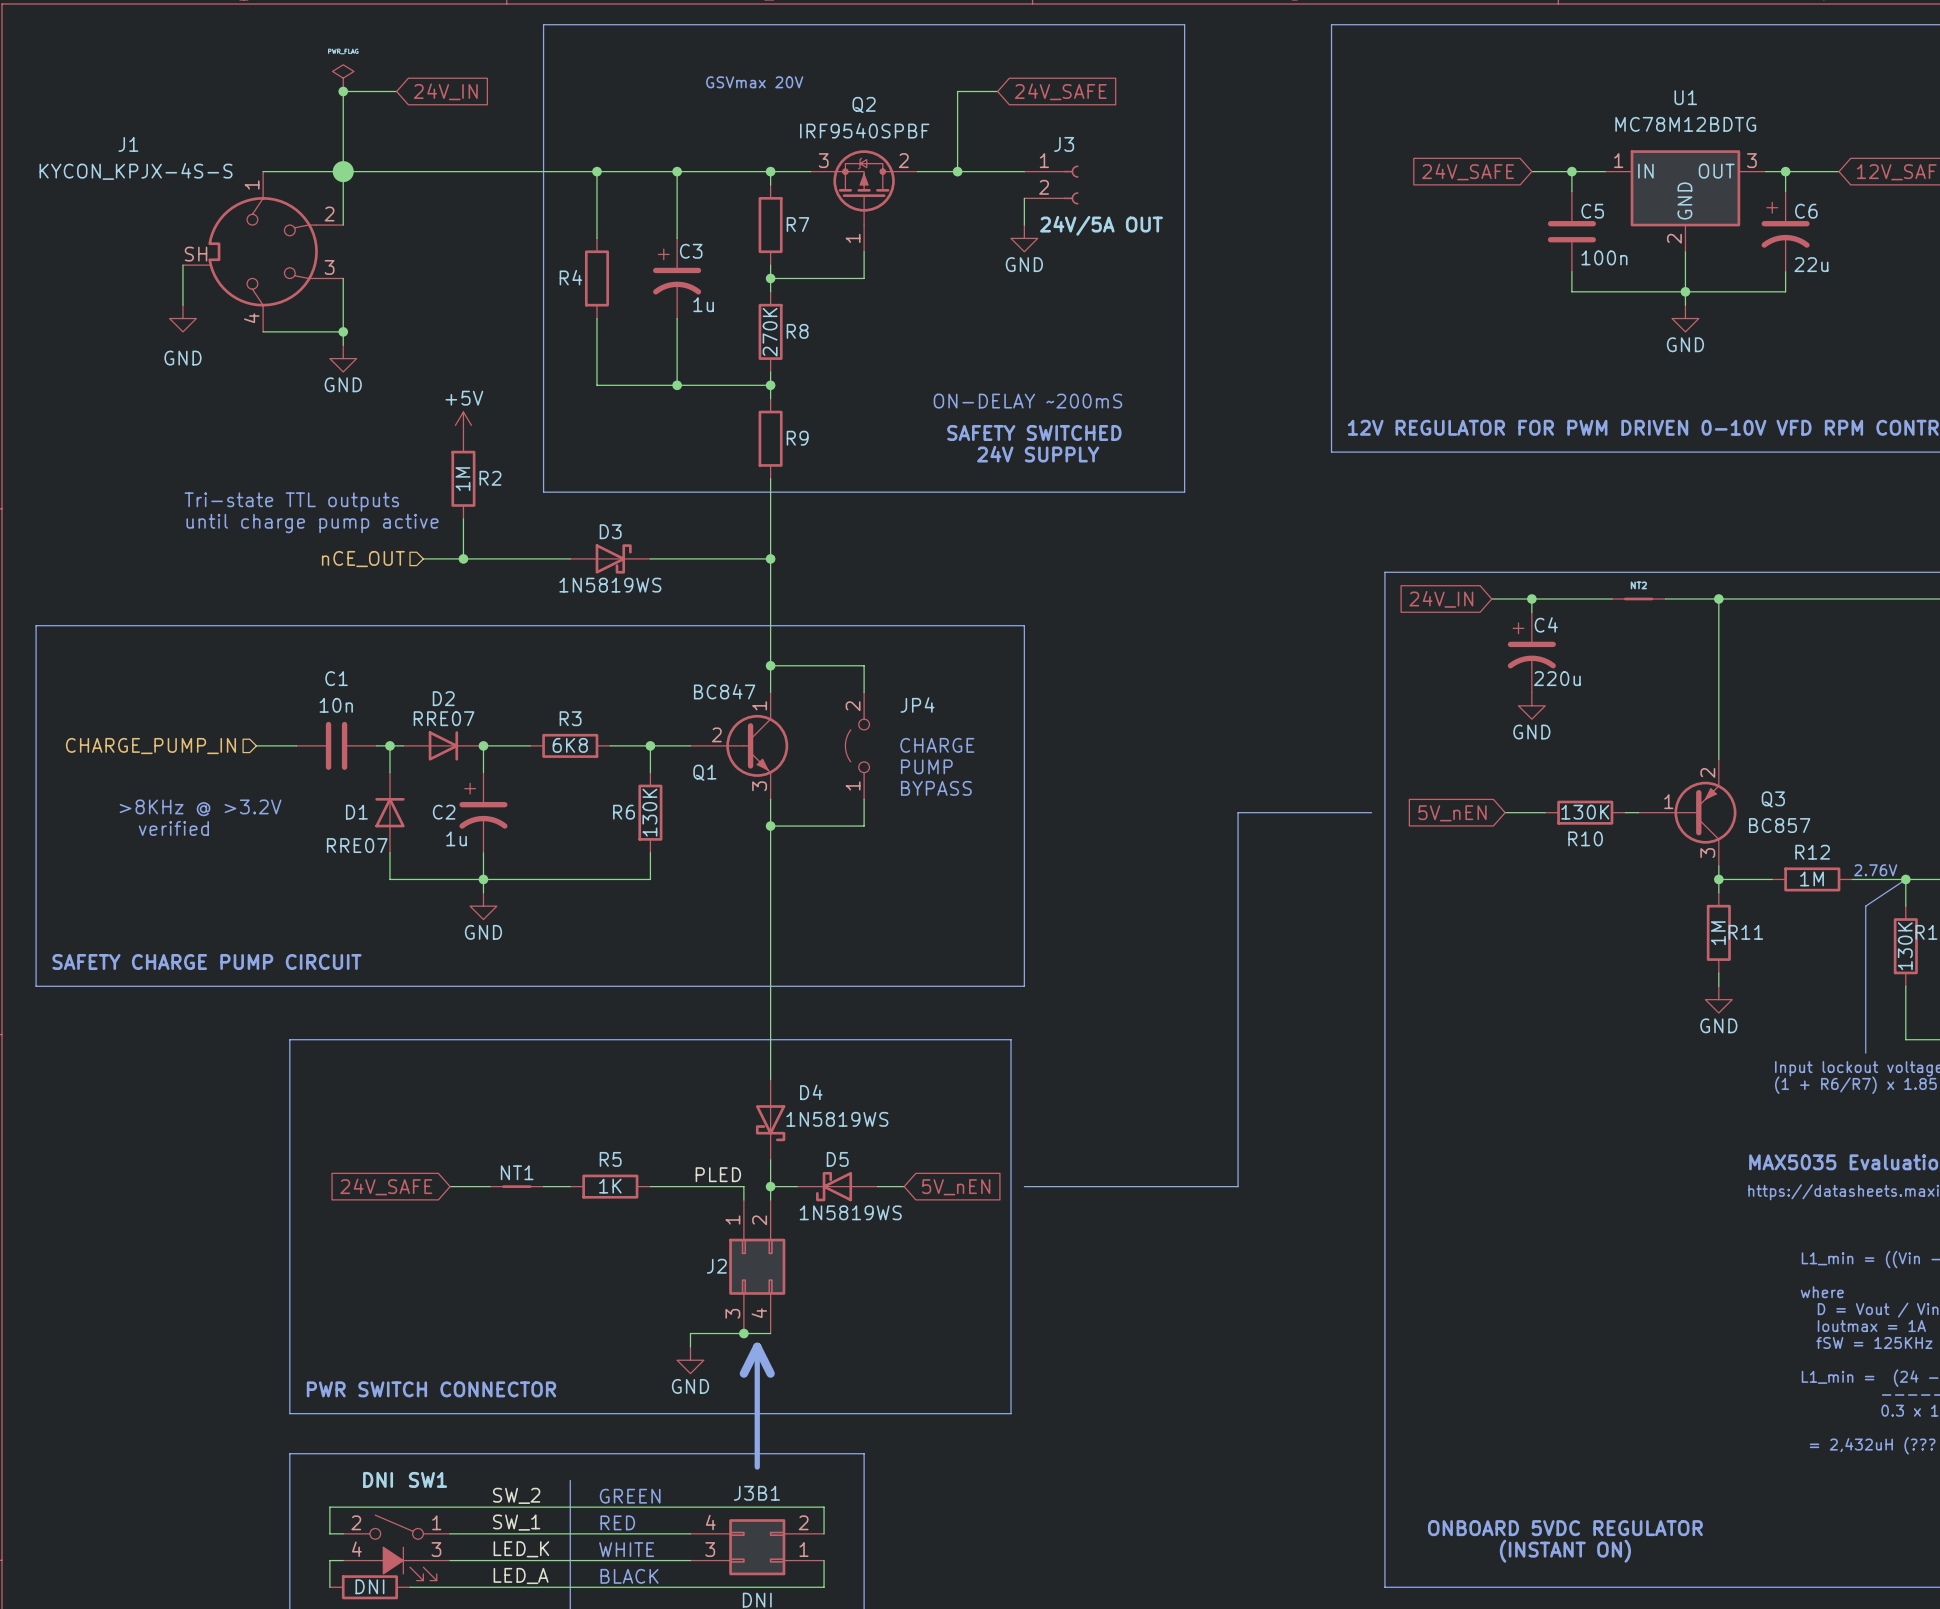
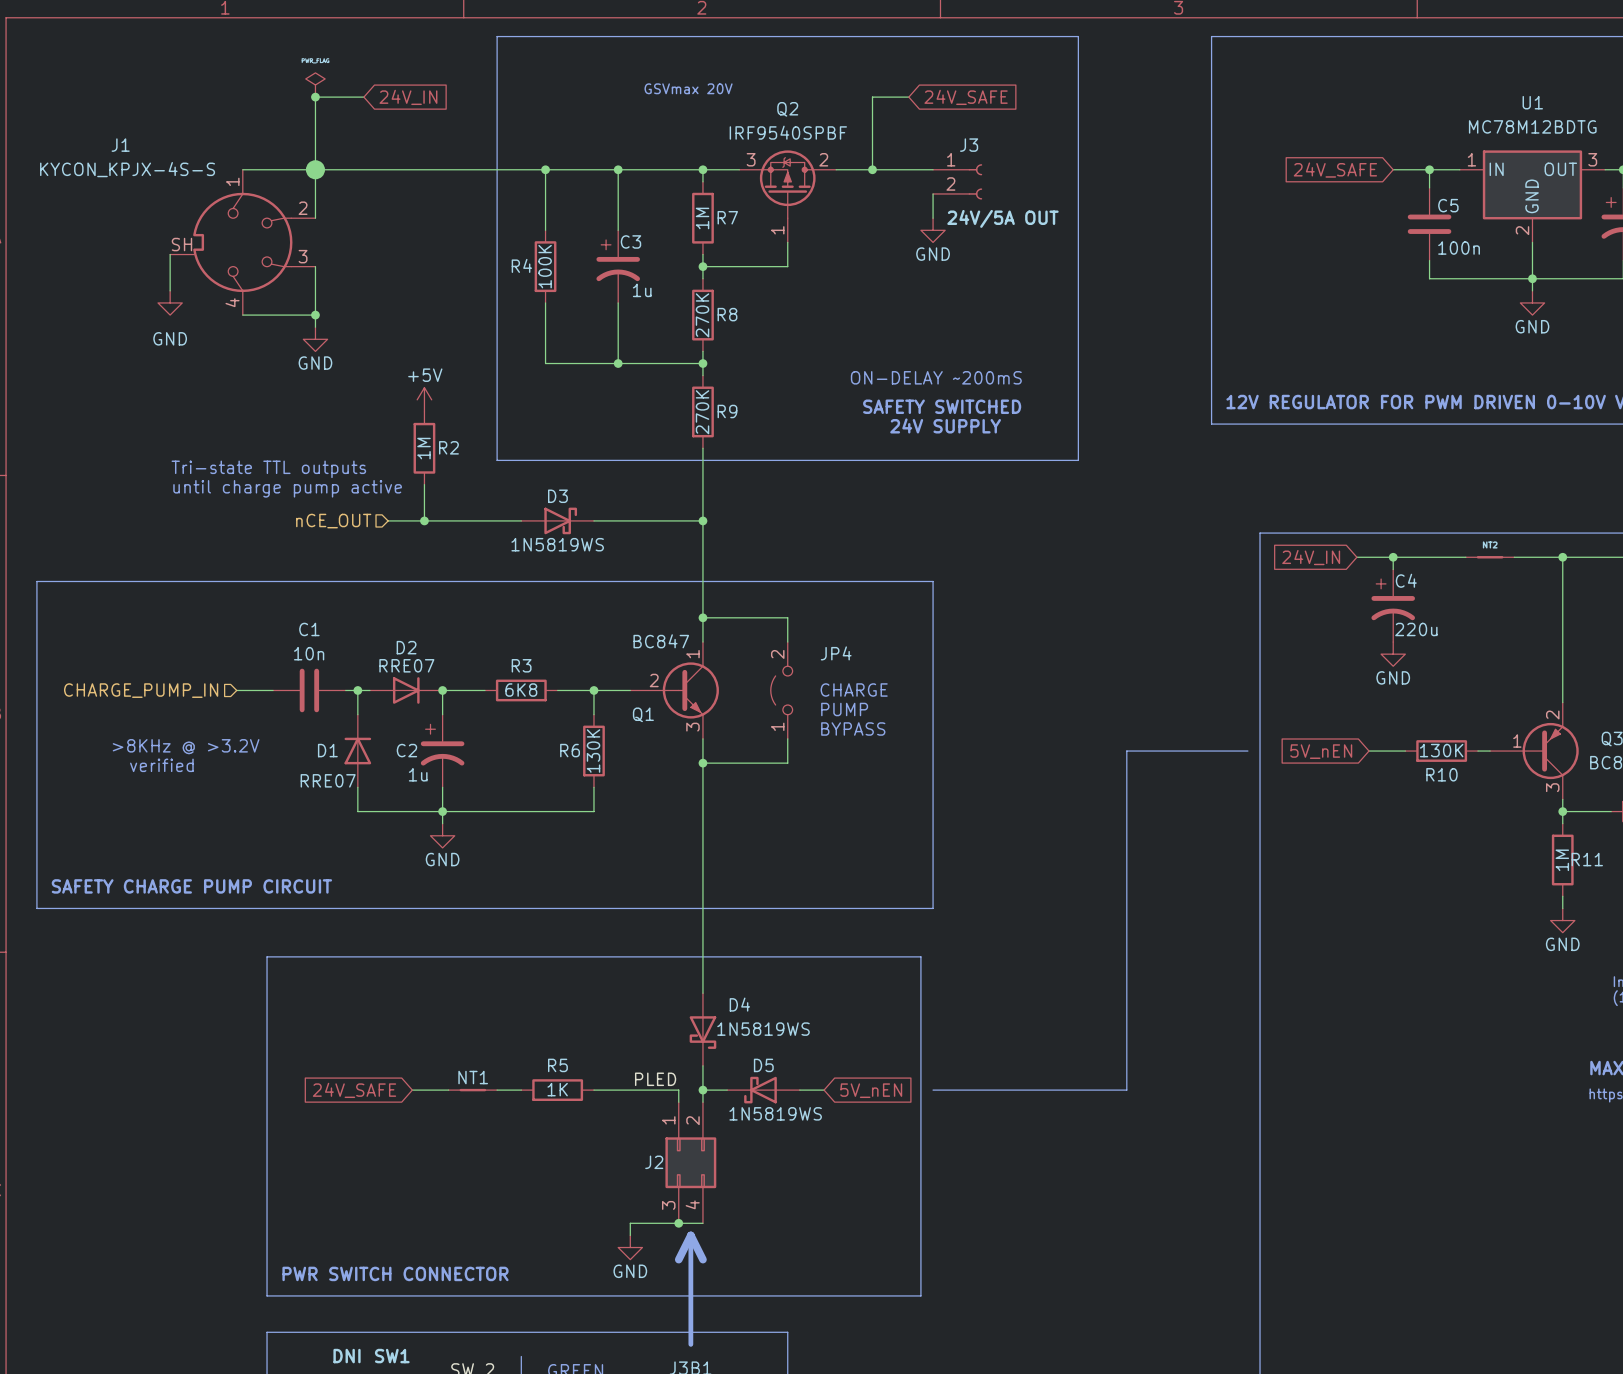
R7 value: none -> 1M (702, 218)
R4 value: none -> 100K (545, 266)
R9 value: none -> 270K (702, 412)

